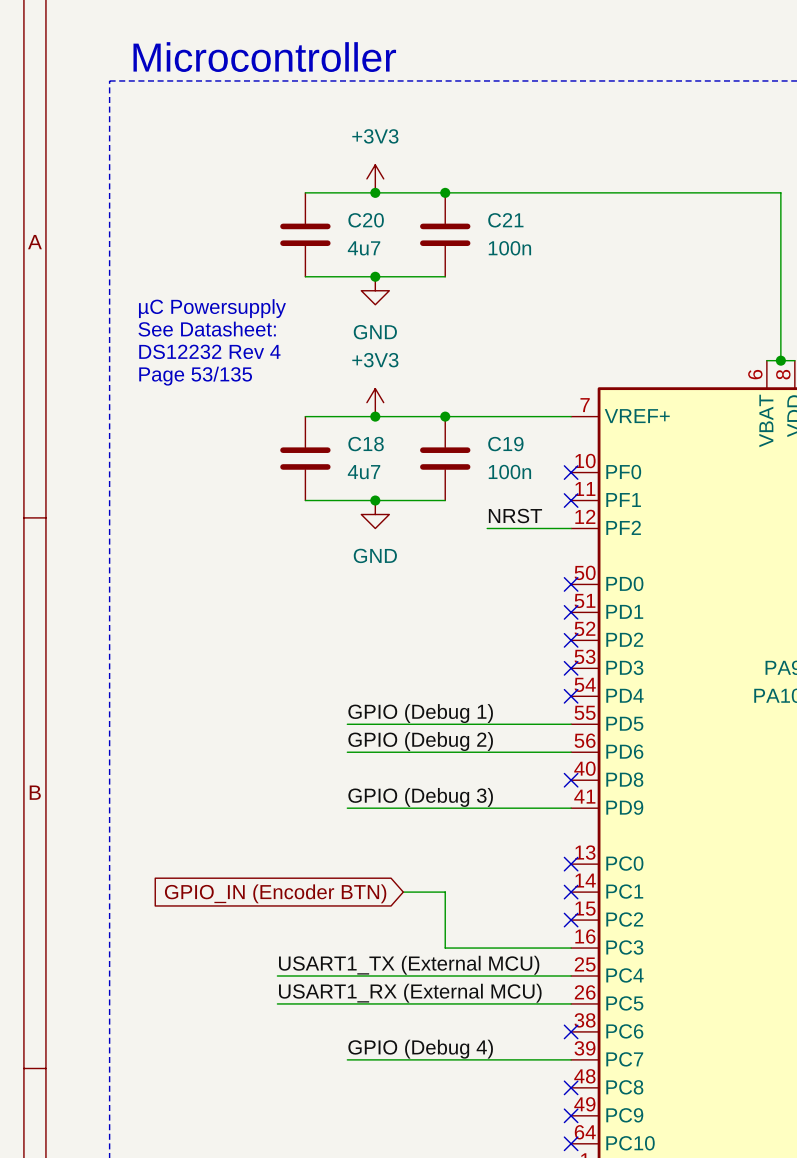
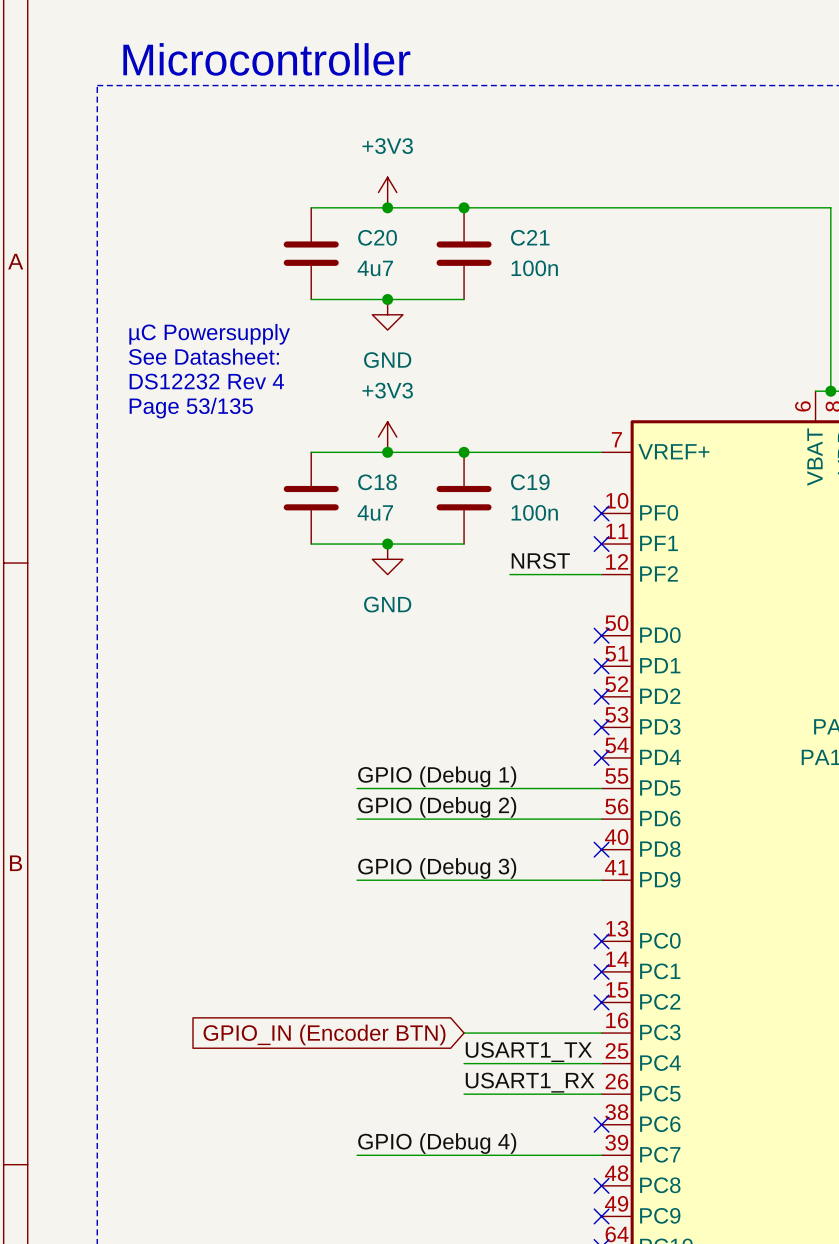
wire: (403, 892) (445, 892) (445, 948) -> none
global label position: GPIO_IN (Encoder BTN) (275, 893) -> GPIO_IN (Encoder BTN) (324, 1034)
label: USART1_TX (External MCU) (409, 965) -> none
label: none -> USART1_TX (528, 1052)
wire: (277, 975) (445, 975) -> none
label: USART1_RX (External MCU) (410, 993) -> none
label: none -> USART1_RX (530, 1082)
wire: (277, 1003) (445, 1003) -> none

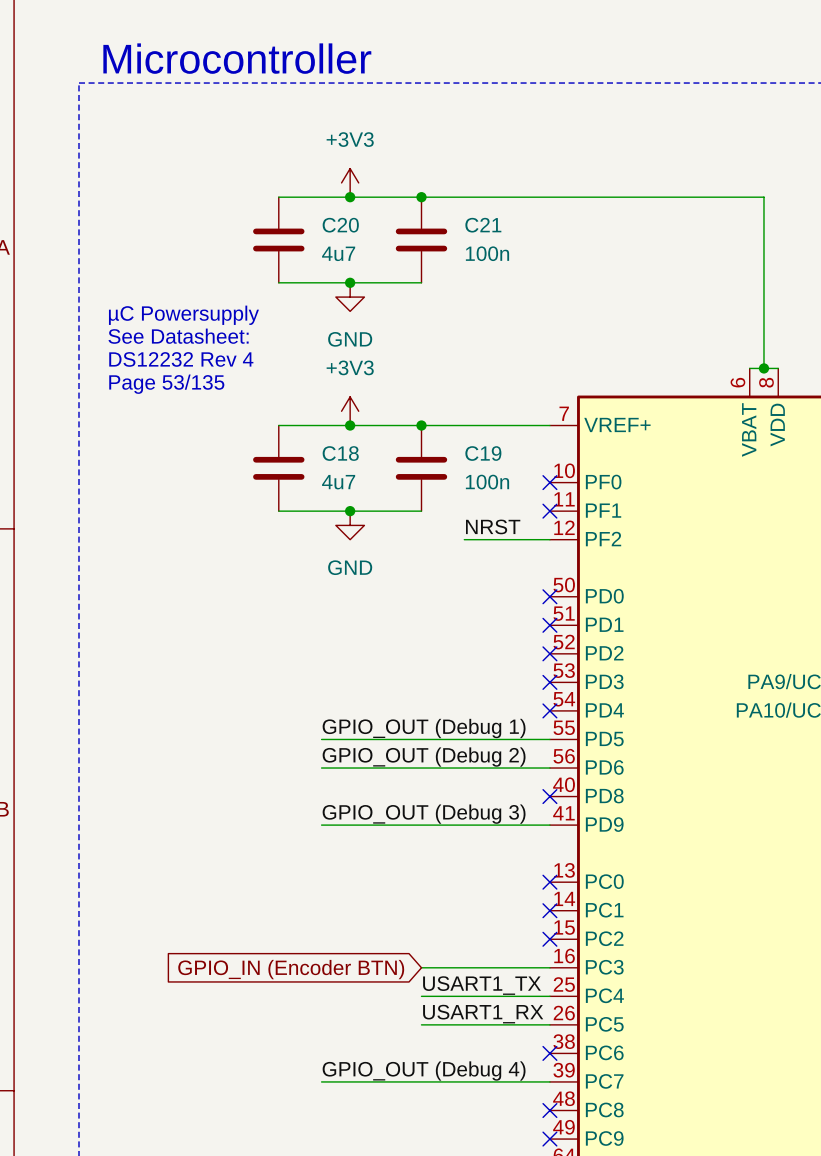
label: GPIO (Debug 1) (437, 776) -> GPIO_OUT (Debug 1) (424, 728)
label: GPIO (Debug 2) (437, 807) -> GPIO_OUT (Debug 2) (424, 757)
label: GPIO (Debug 3) (437, 868) -> GPIO_OUT (Debug 3) (424, 814)
label: GPIO (Debug 4) (437, 1143) -> GPIO_OUT (Debug 4) (424, 1071)

